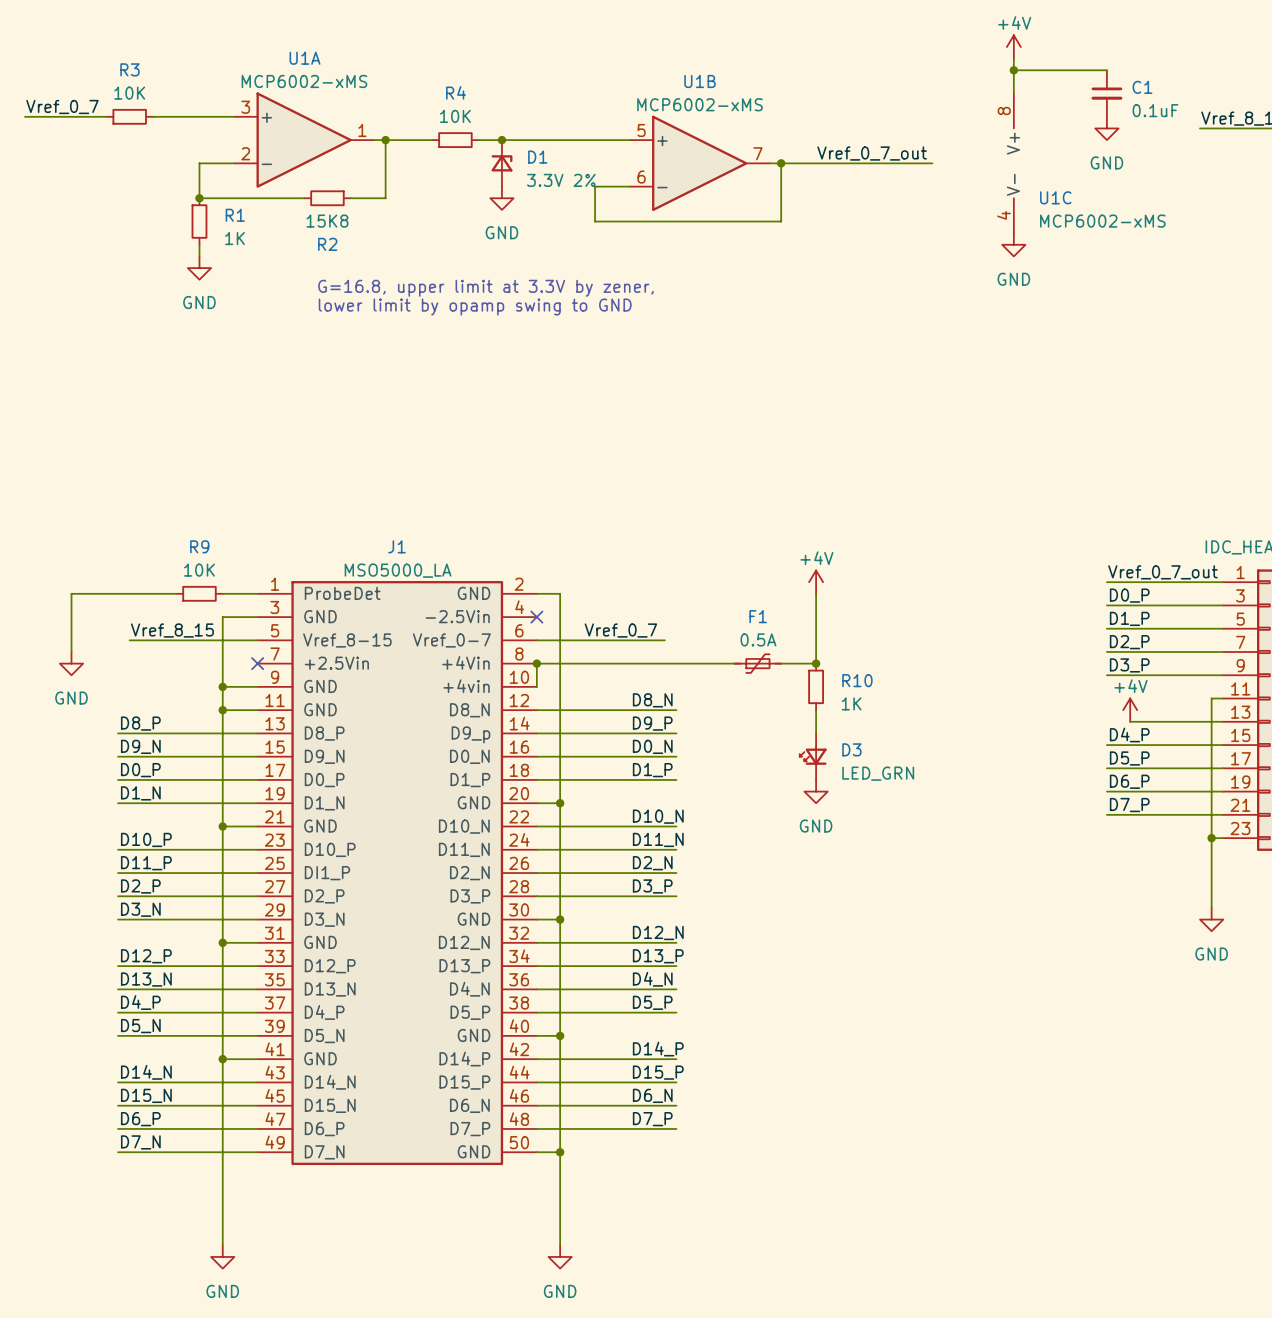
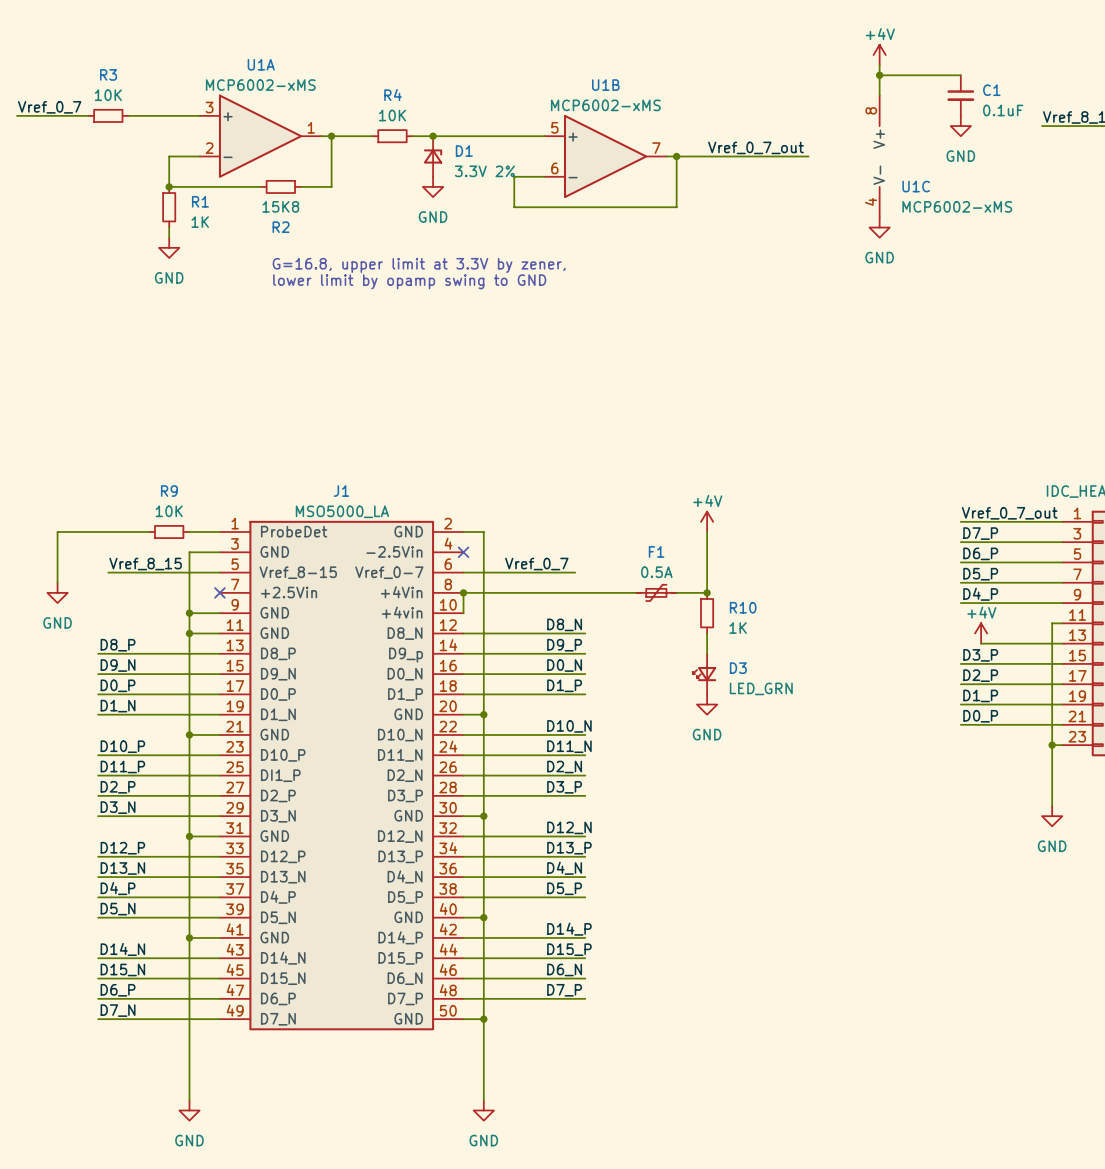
label: D0_P (1129, 595) -> D7_P (980, 533)
label: D1_P (1129, 618) -> D6_P (980, 553)
label: D2_P (1129, 642) -> D5_P (980, 574)
label: D3_P (1129, 665) -> D4_P (980, 594)
label: D4_P (1129, 734) -> D3_P (980, 655)
label: D5_P (1129, 758) -> D2_P (980, 675)
label: D6_P (1129, 781) -> D1_P (980, 695)
label: D7_P (1129, 805) -> D0_P (980, 716)

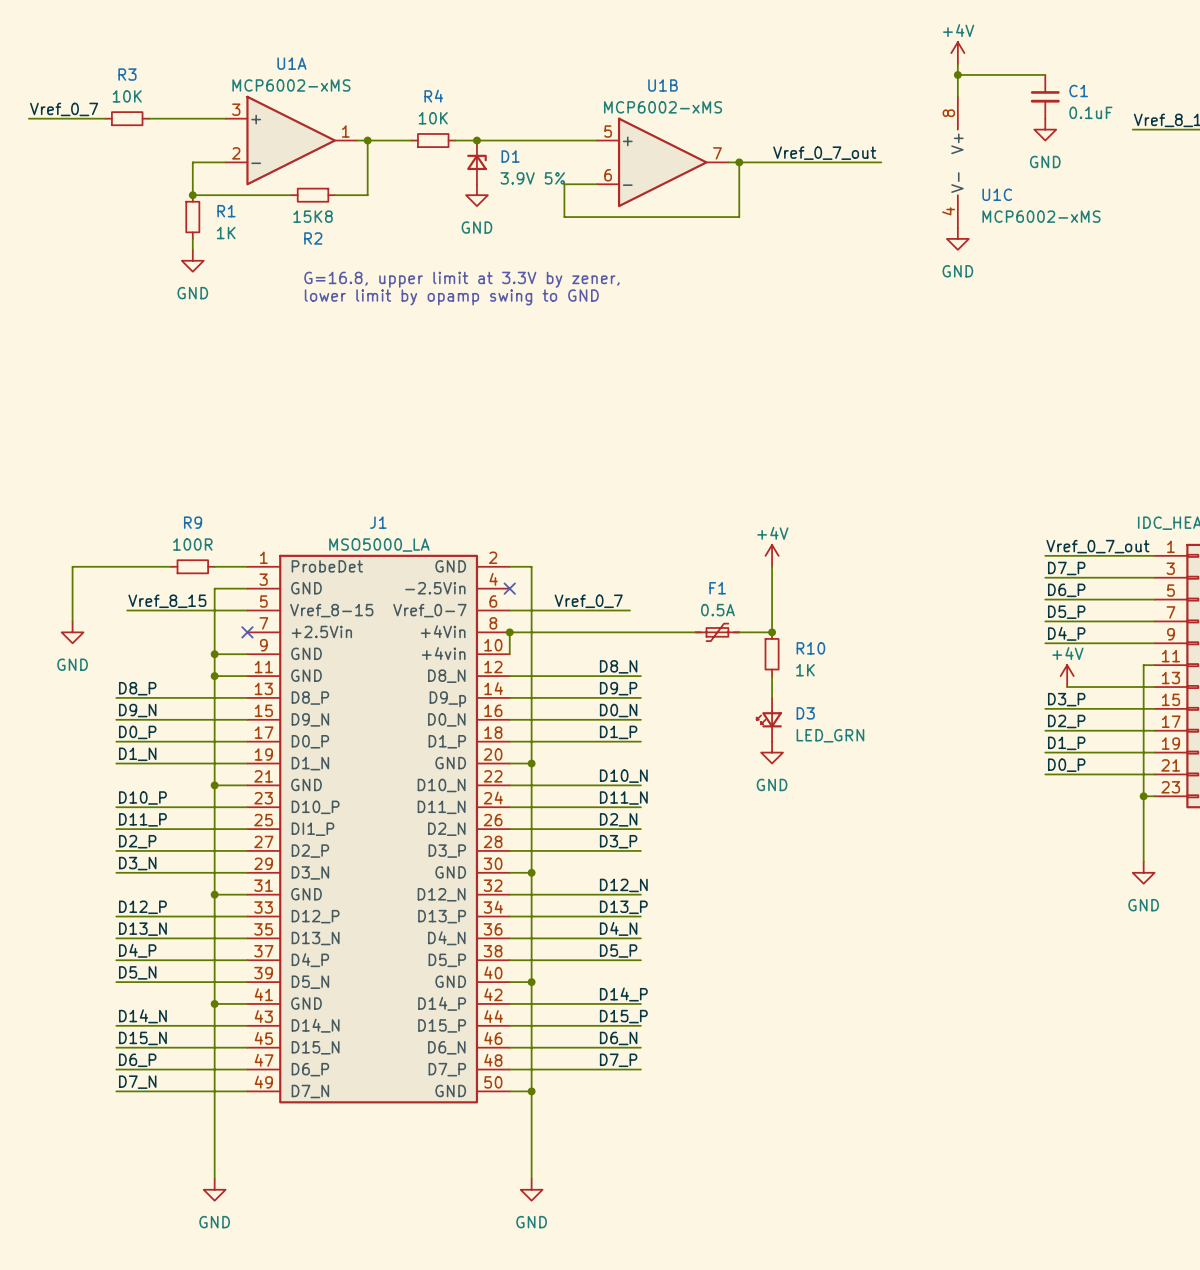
D1 value: 3.3V 2% (484, 171) -> 3.9V 5% (532, 178)
R9 value: 10K (169, 511) -> 100R (192, 544)

